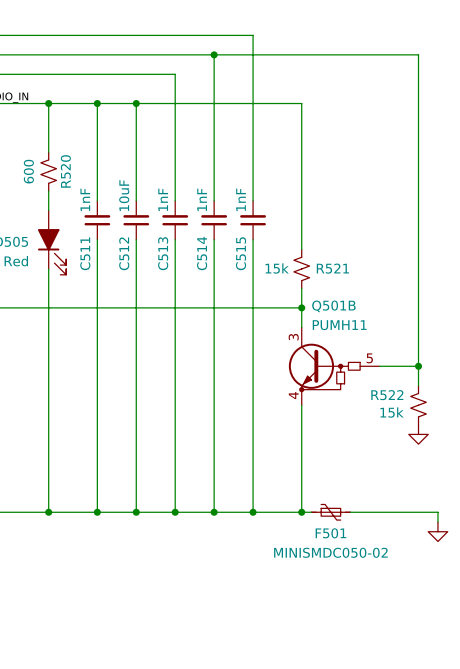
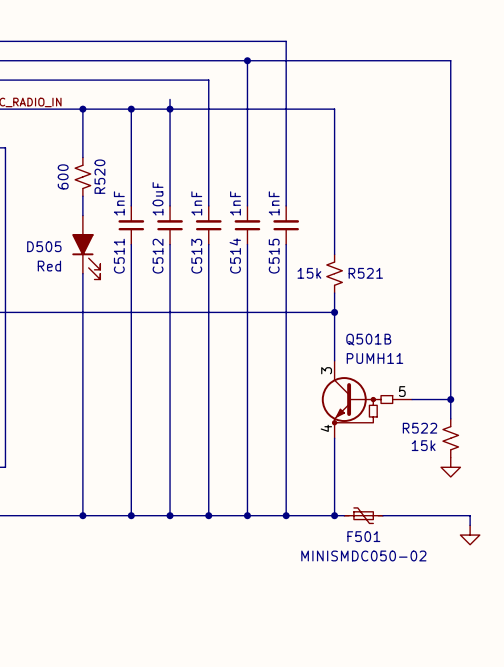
wire: none -> (170, 99) (170, 109)
Q501B position: (334, 366) -> (366, 399)
wire: (379, 366) (418, 366) -> (412, 399) (450, 399)
junction position: (418, 366) -> (450, 399)
wire: none -> (450, 389) (450, 418)
R522 position: (418, 405) -> (450, 438)
power symbol position: (418, 434) -> (450, 467)

